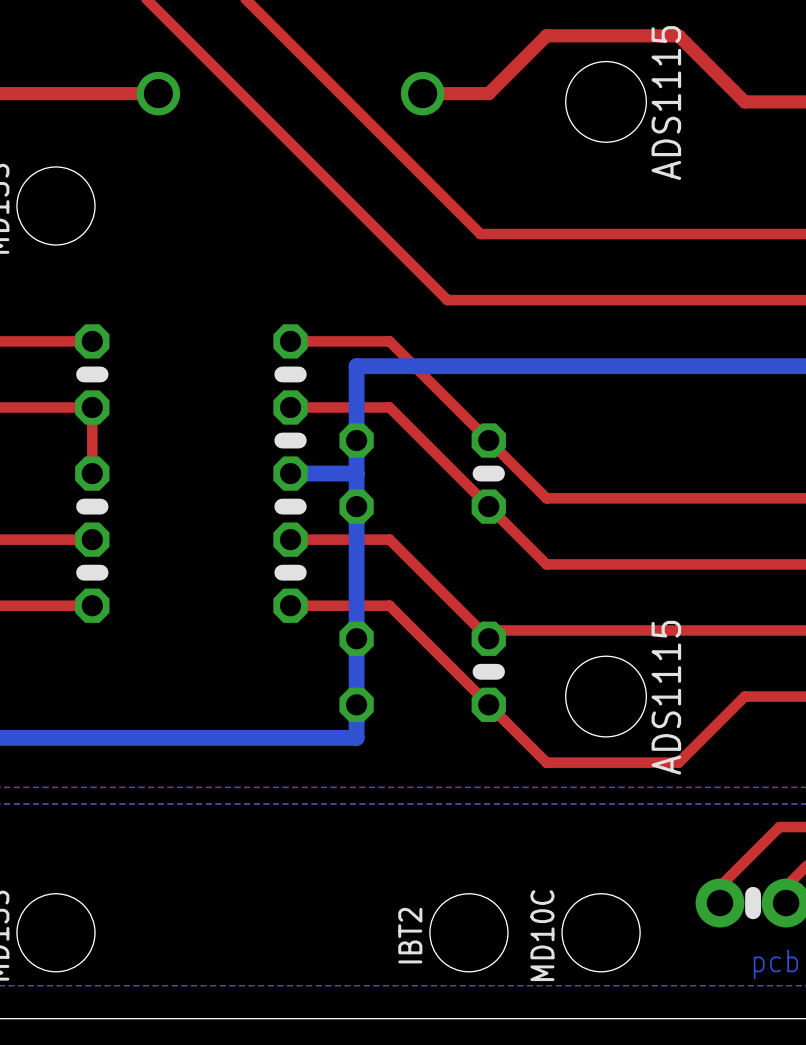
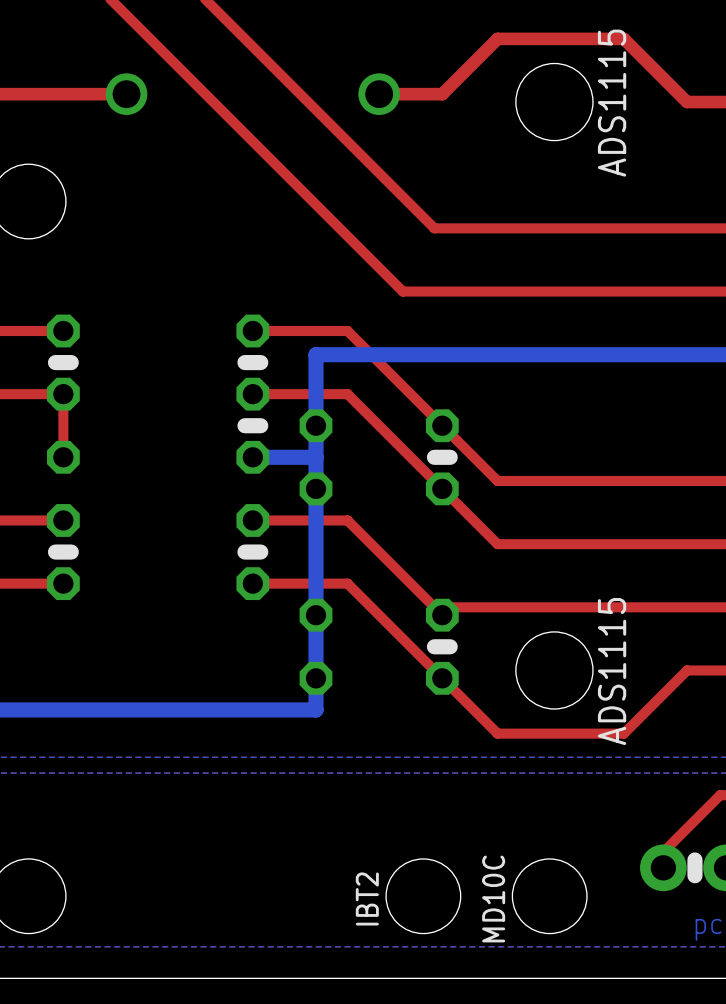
line: (100, 506) (84, 506) -> none
line: (298, 506) (282, 506) -> none

